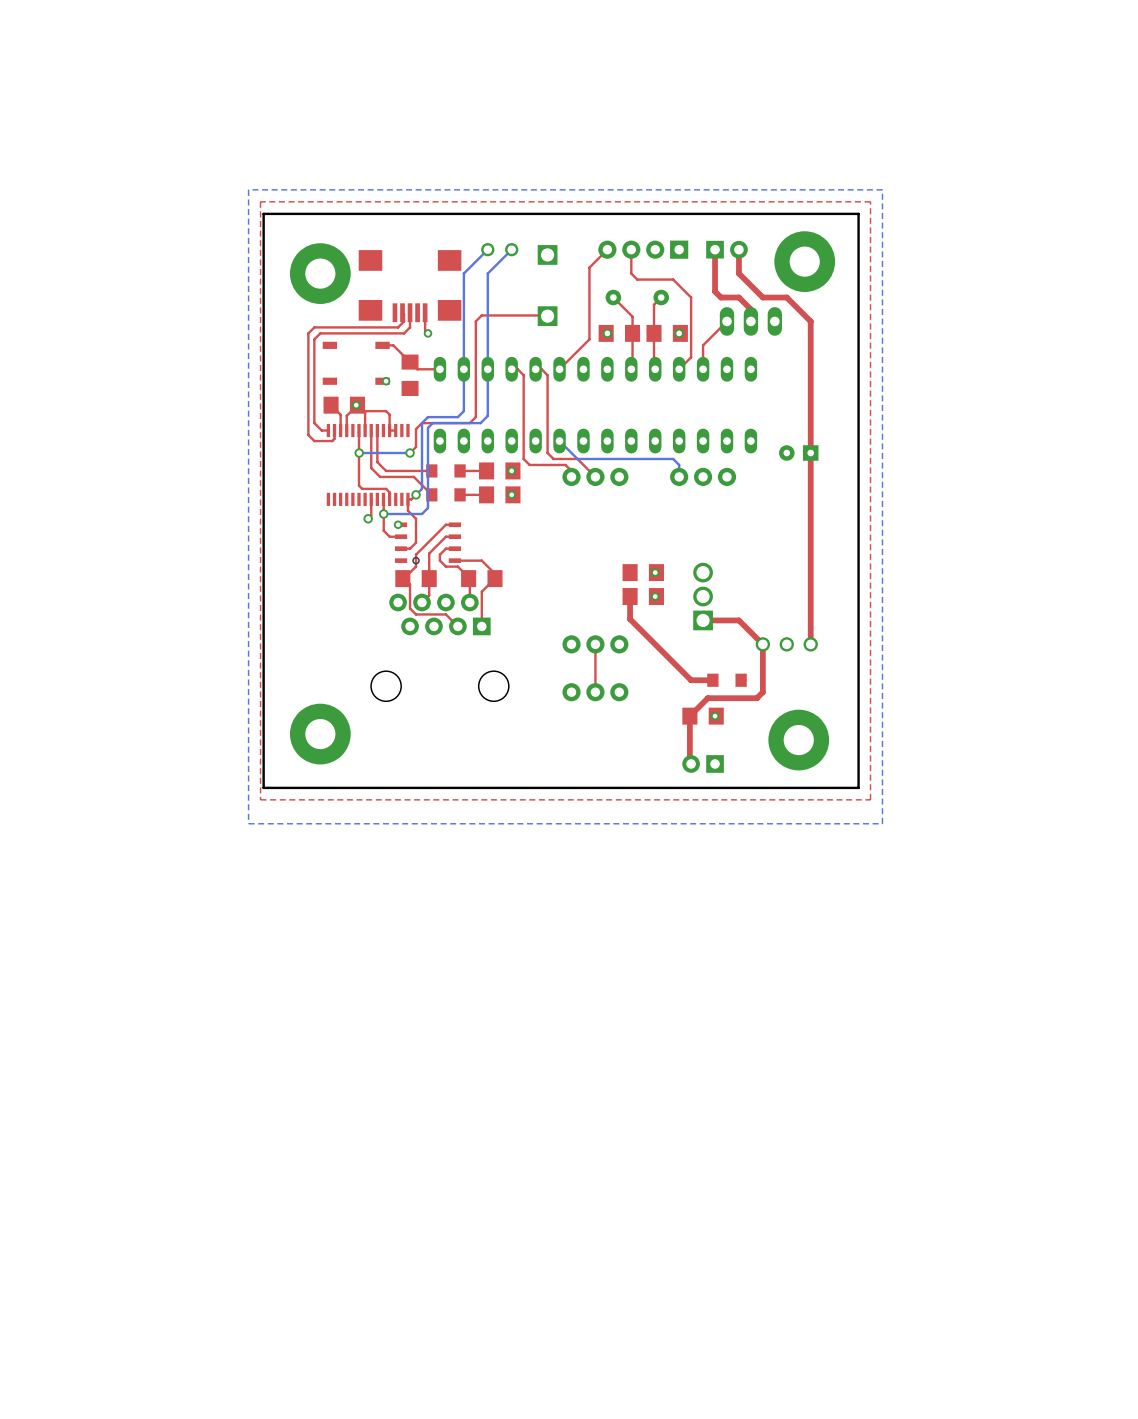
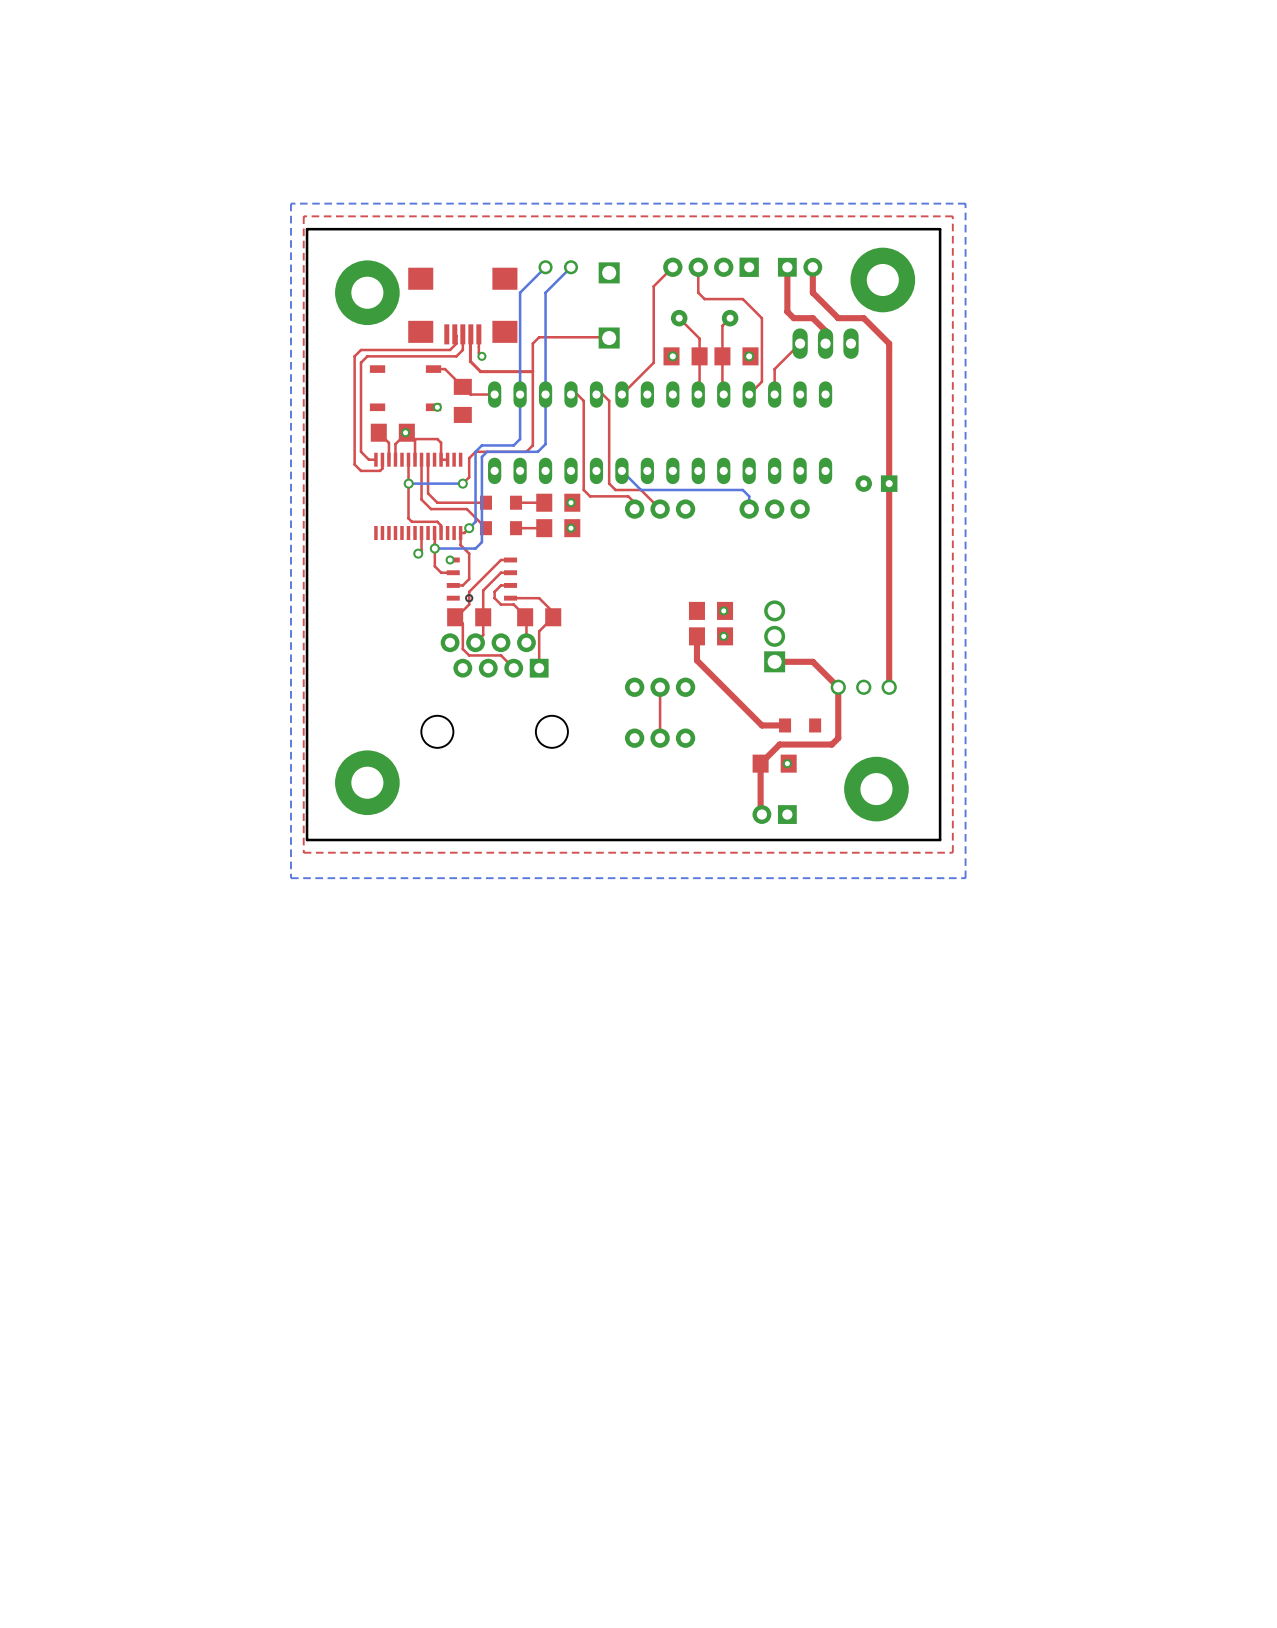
top track: none -> (470, 334) (470, 361) (480, 371) (532, 371)

